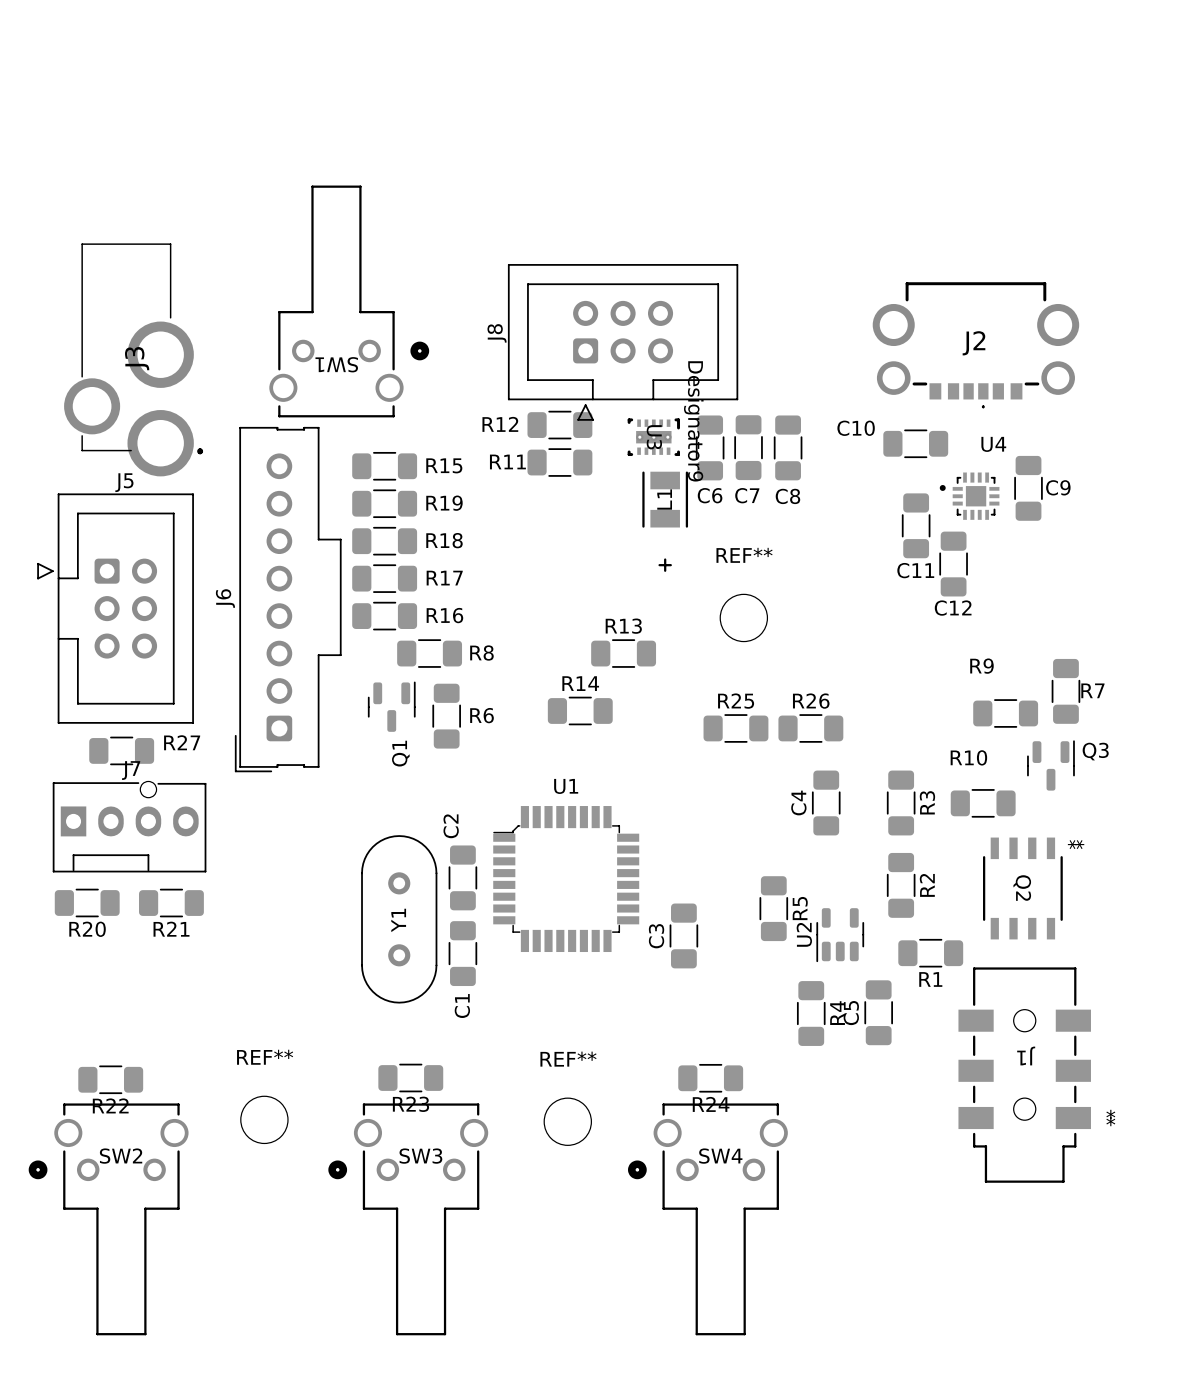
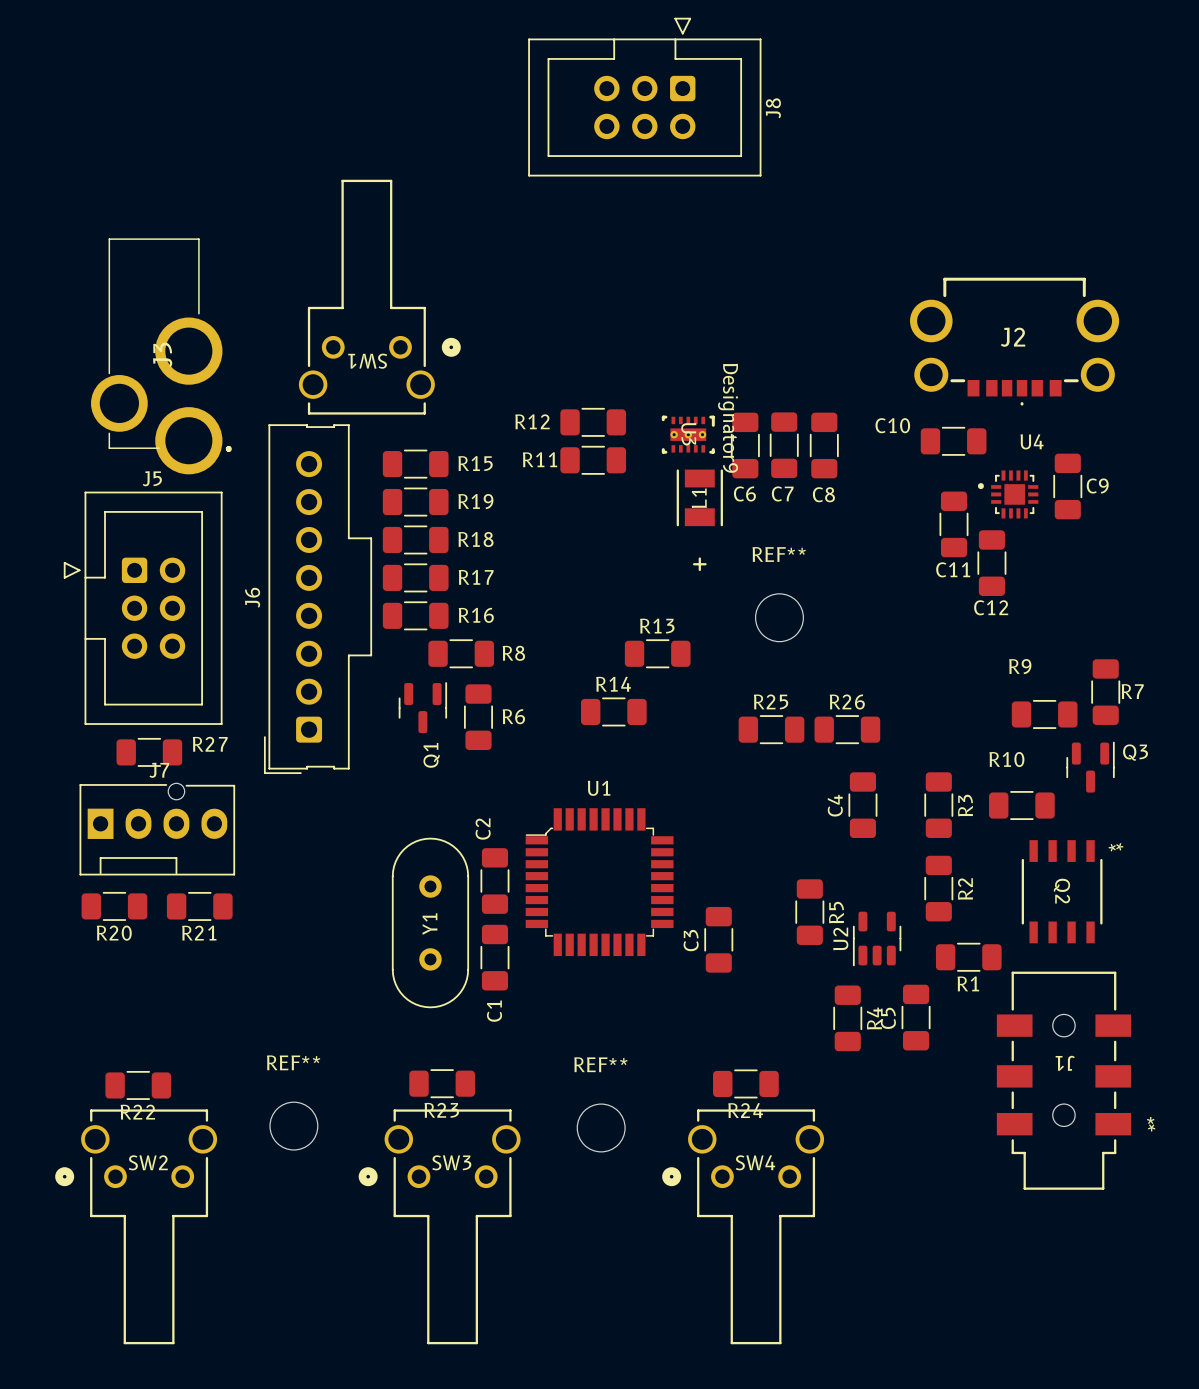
J8 rotation: 0° (623, 342) -> 180° (644, 97)
J8 position: (623, 342) -> (644, 97)

